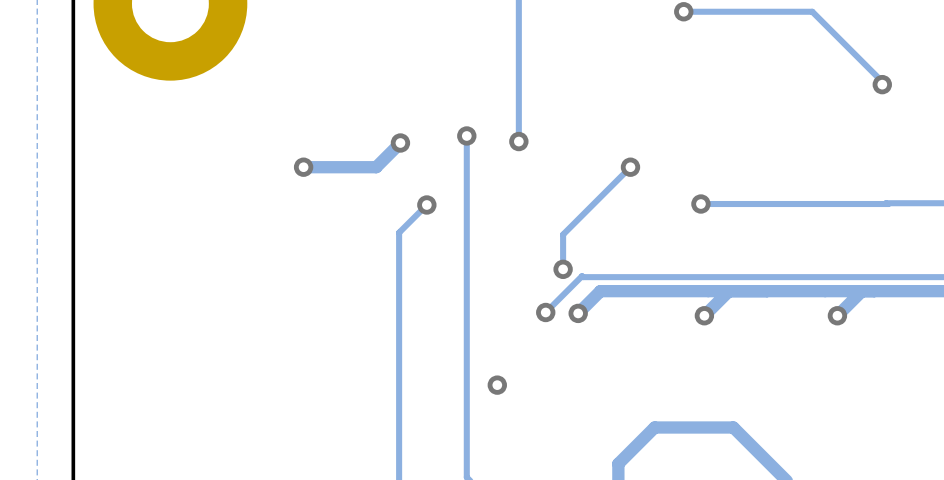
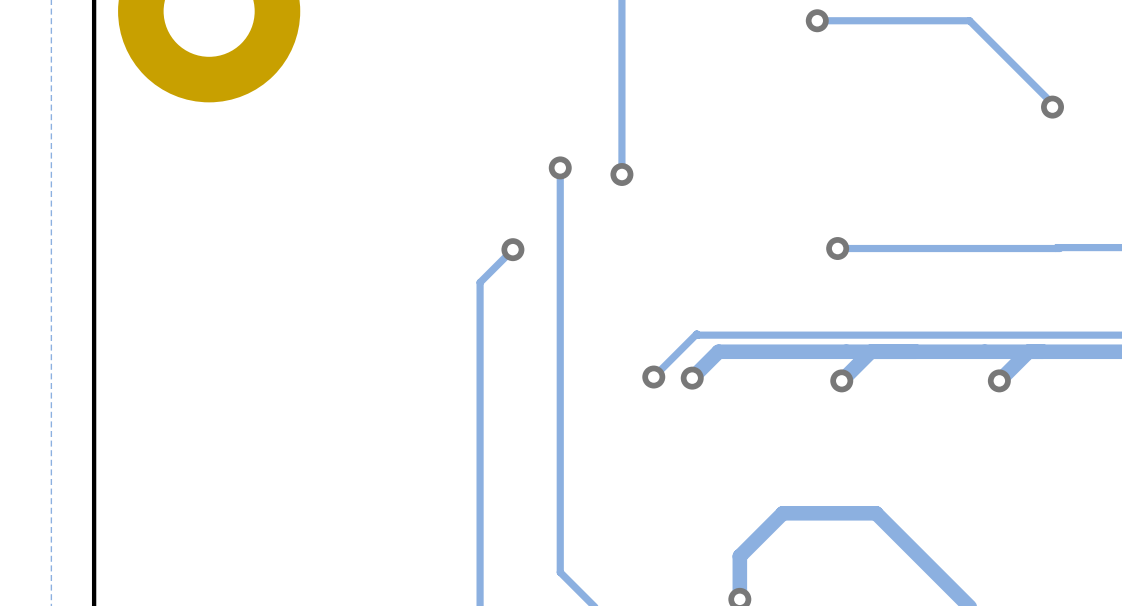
track: (400, 142) (376, 167) (303, 167) -> none
via: (400, 142) -> none
via: (303, 167) -> none
track: (630, 167) (563, 234) (563, 269) -> none
via: (630, 167) -> none
via: (563, 269) -> none
via: (497, 385) -> none

